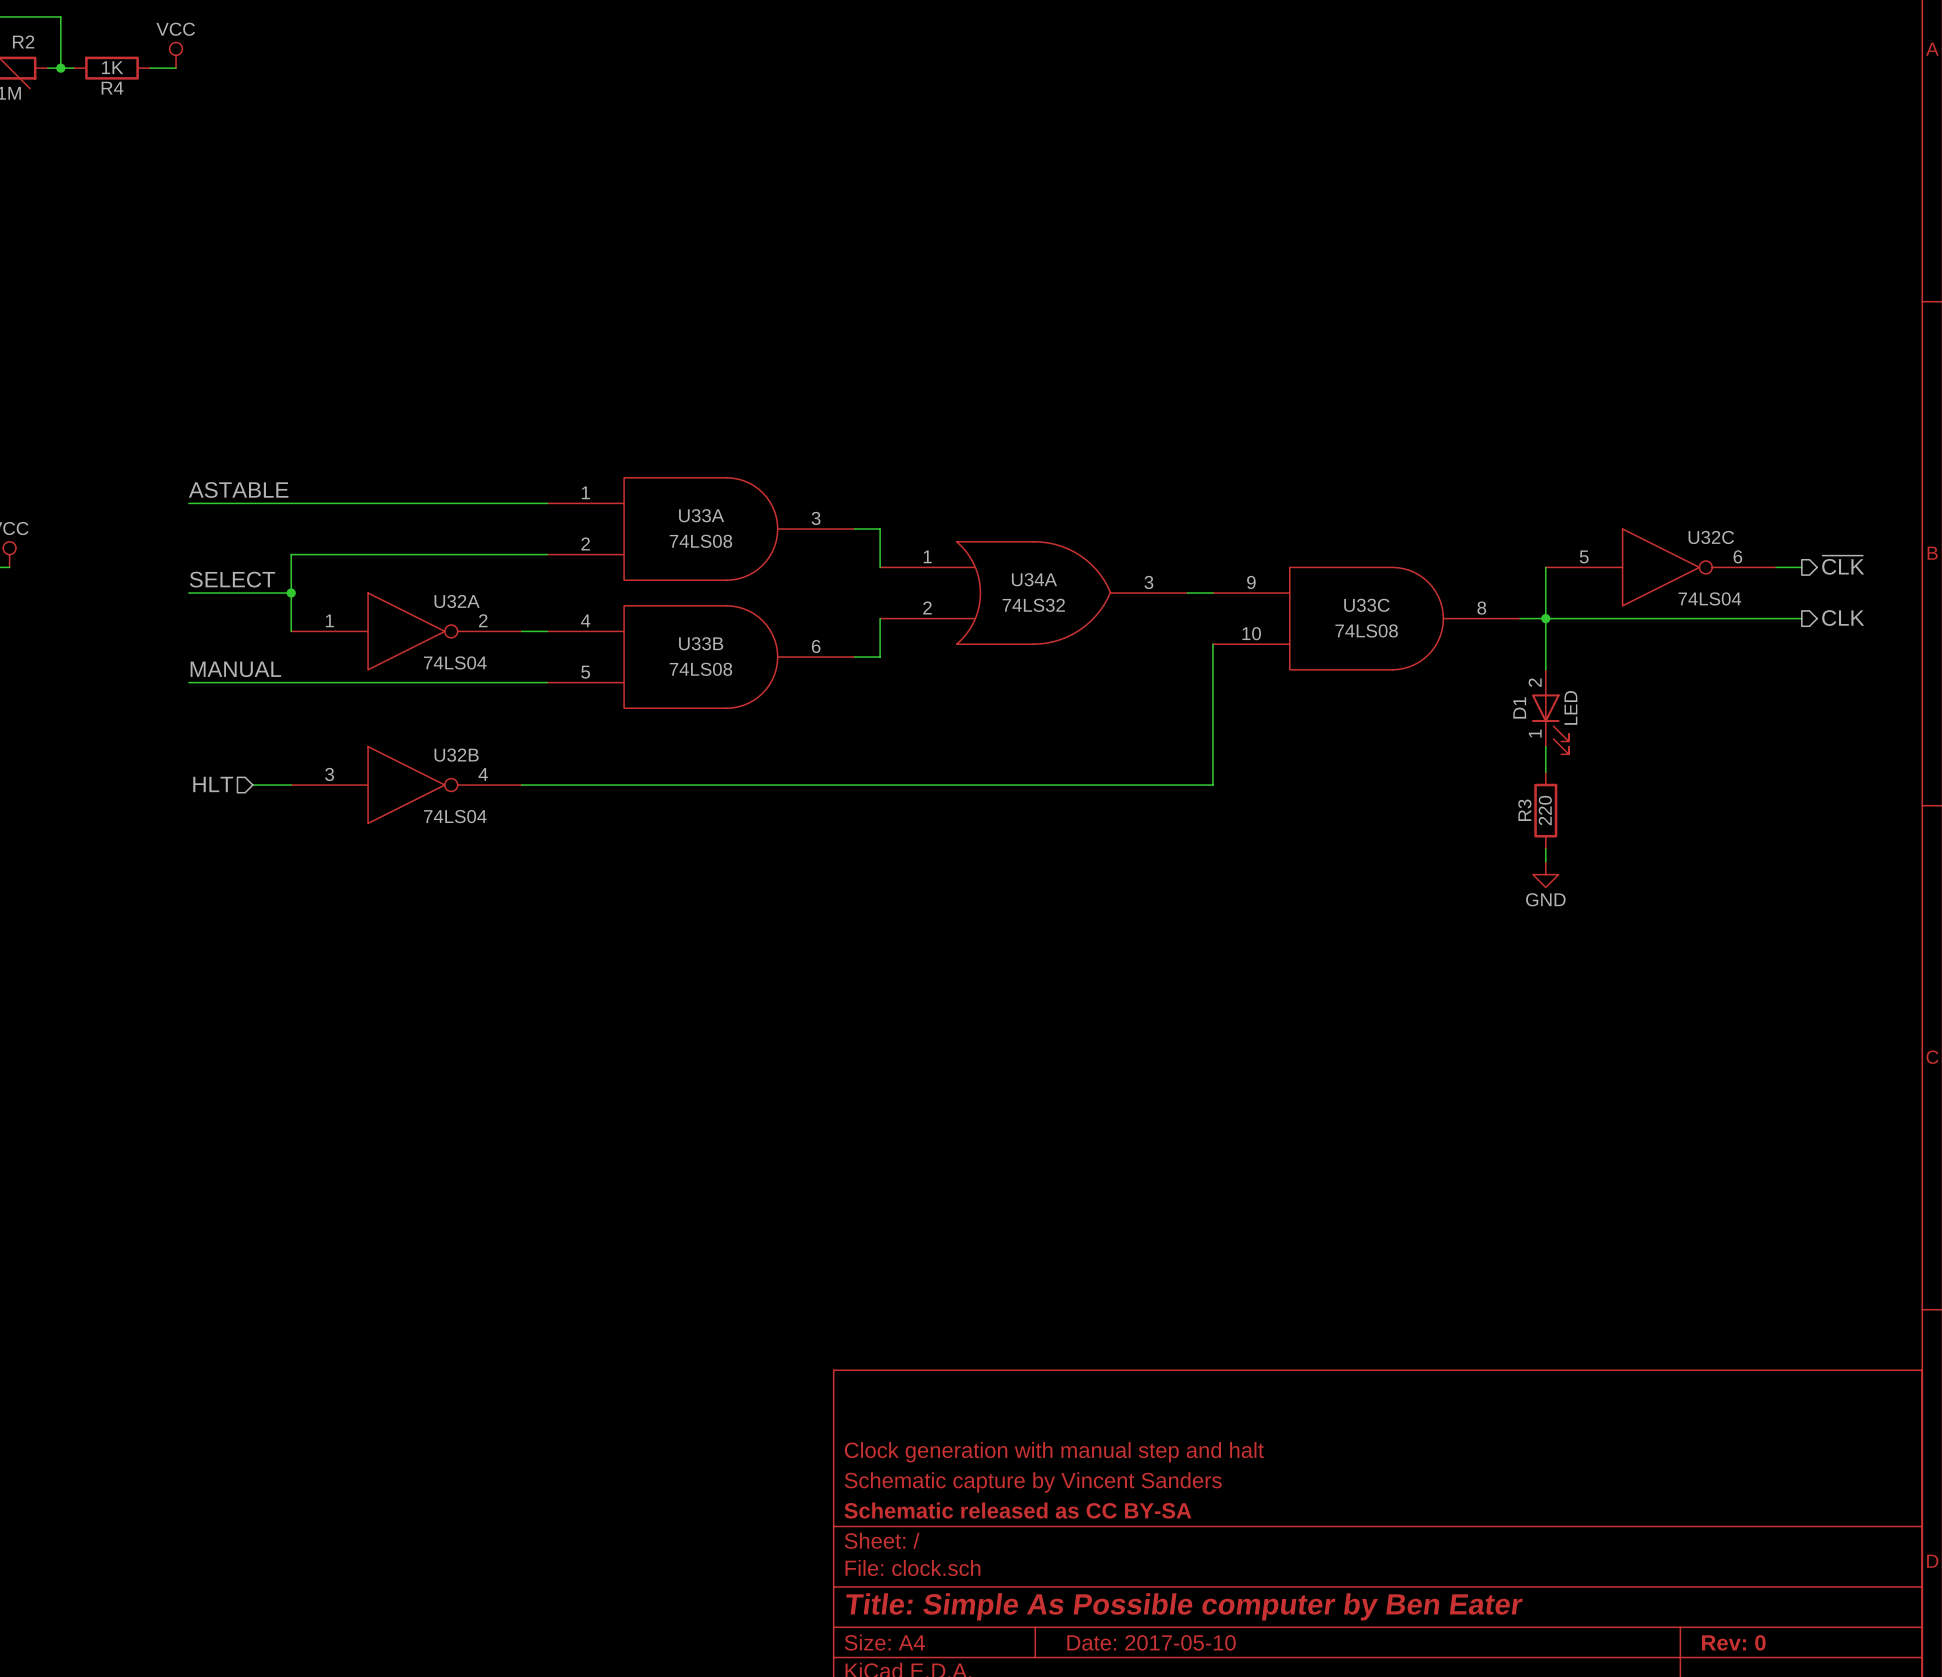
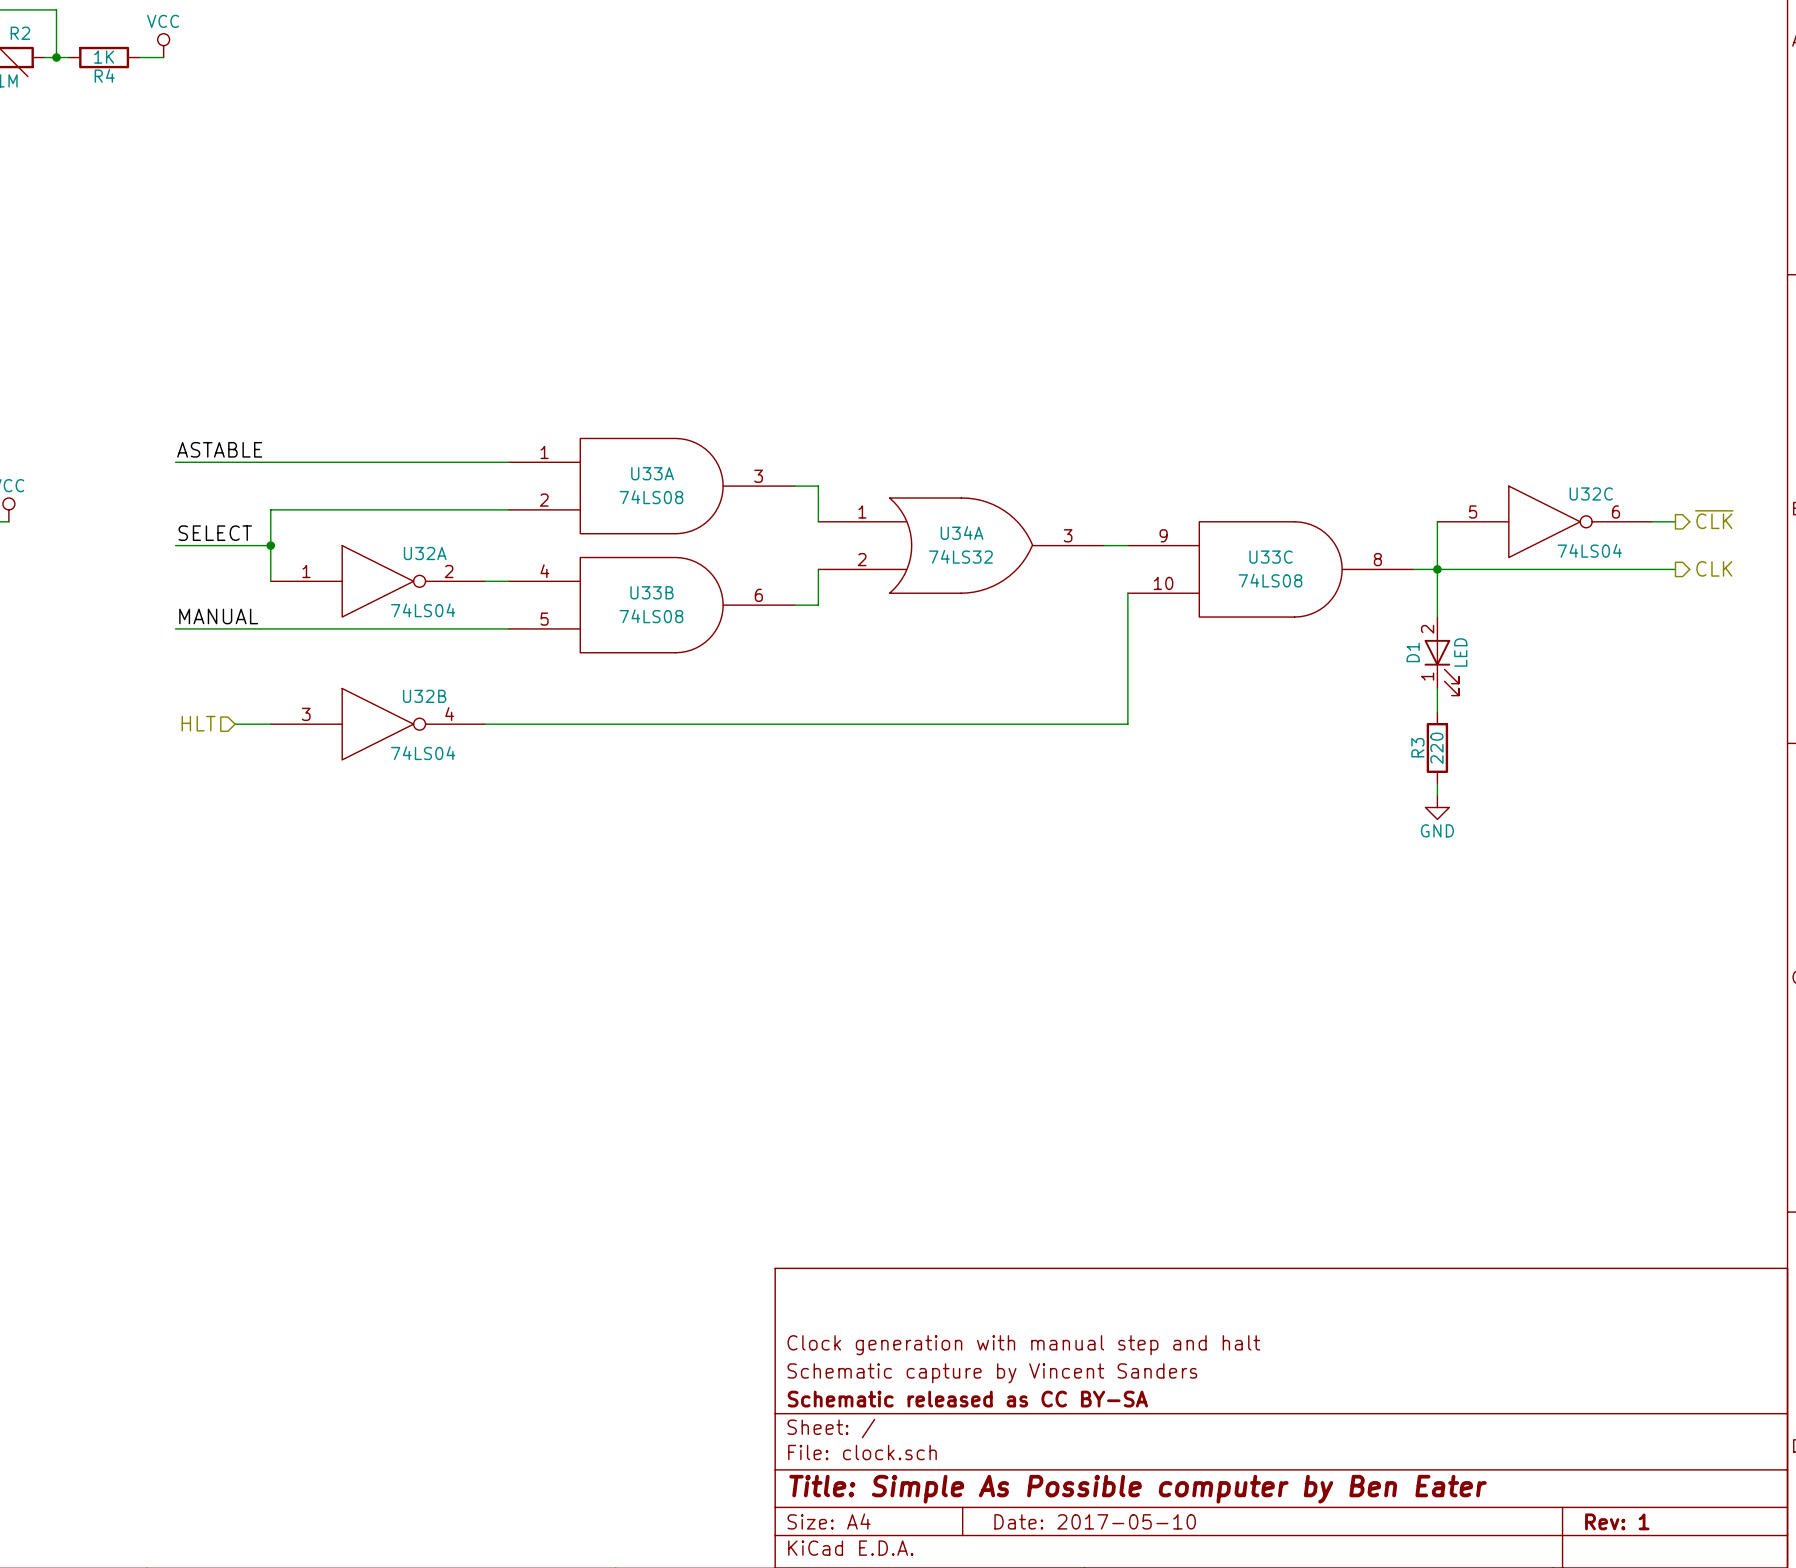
title block: Rev: 0 (1733, 1642) -> Rev: 1 (1617, 1521)

